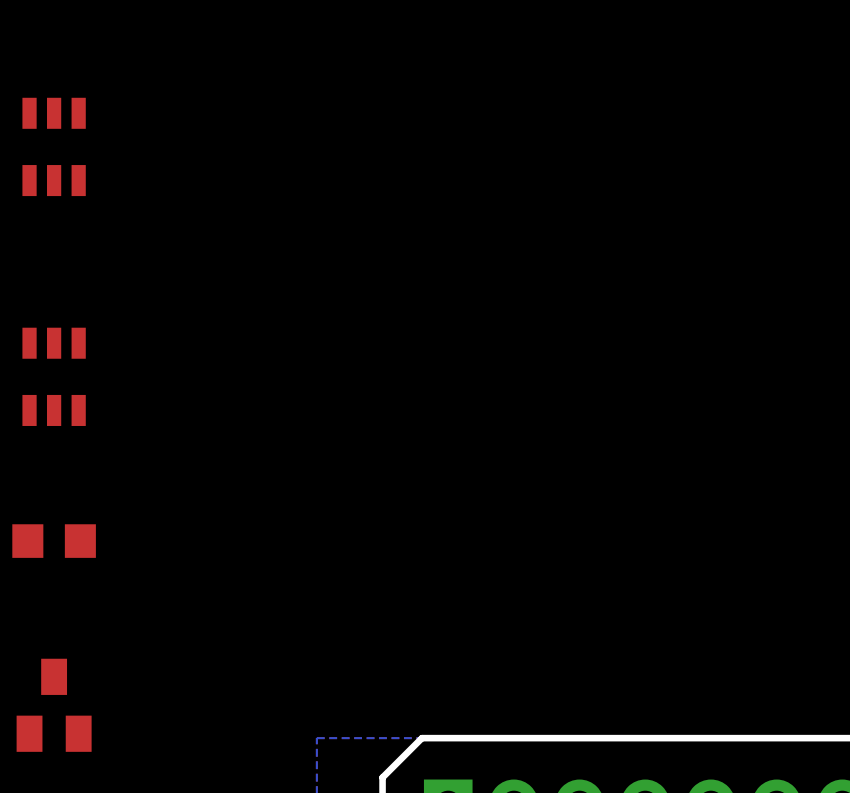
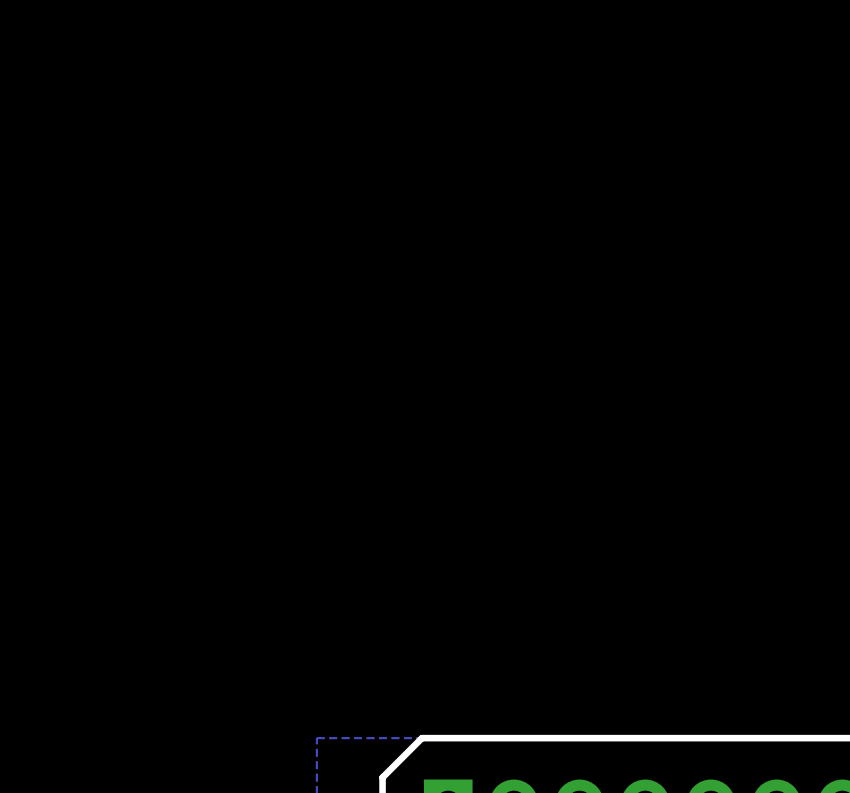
part: (54, 146) -> none
part: (54, 376) -> none
part: (54, 541) -> none
part: (54, 705) -> none

